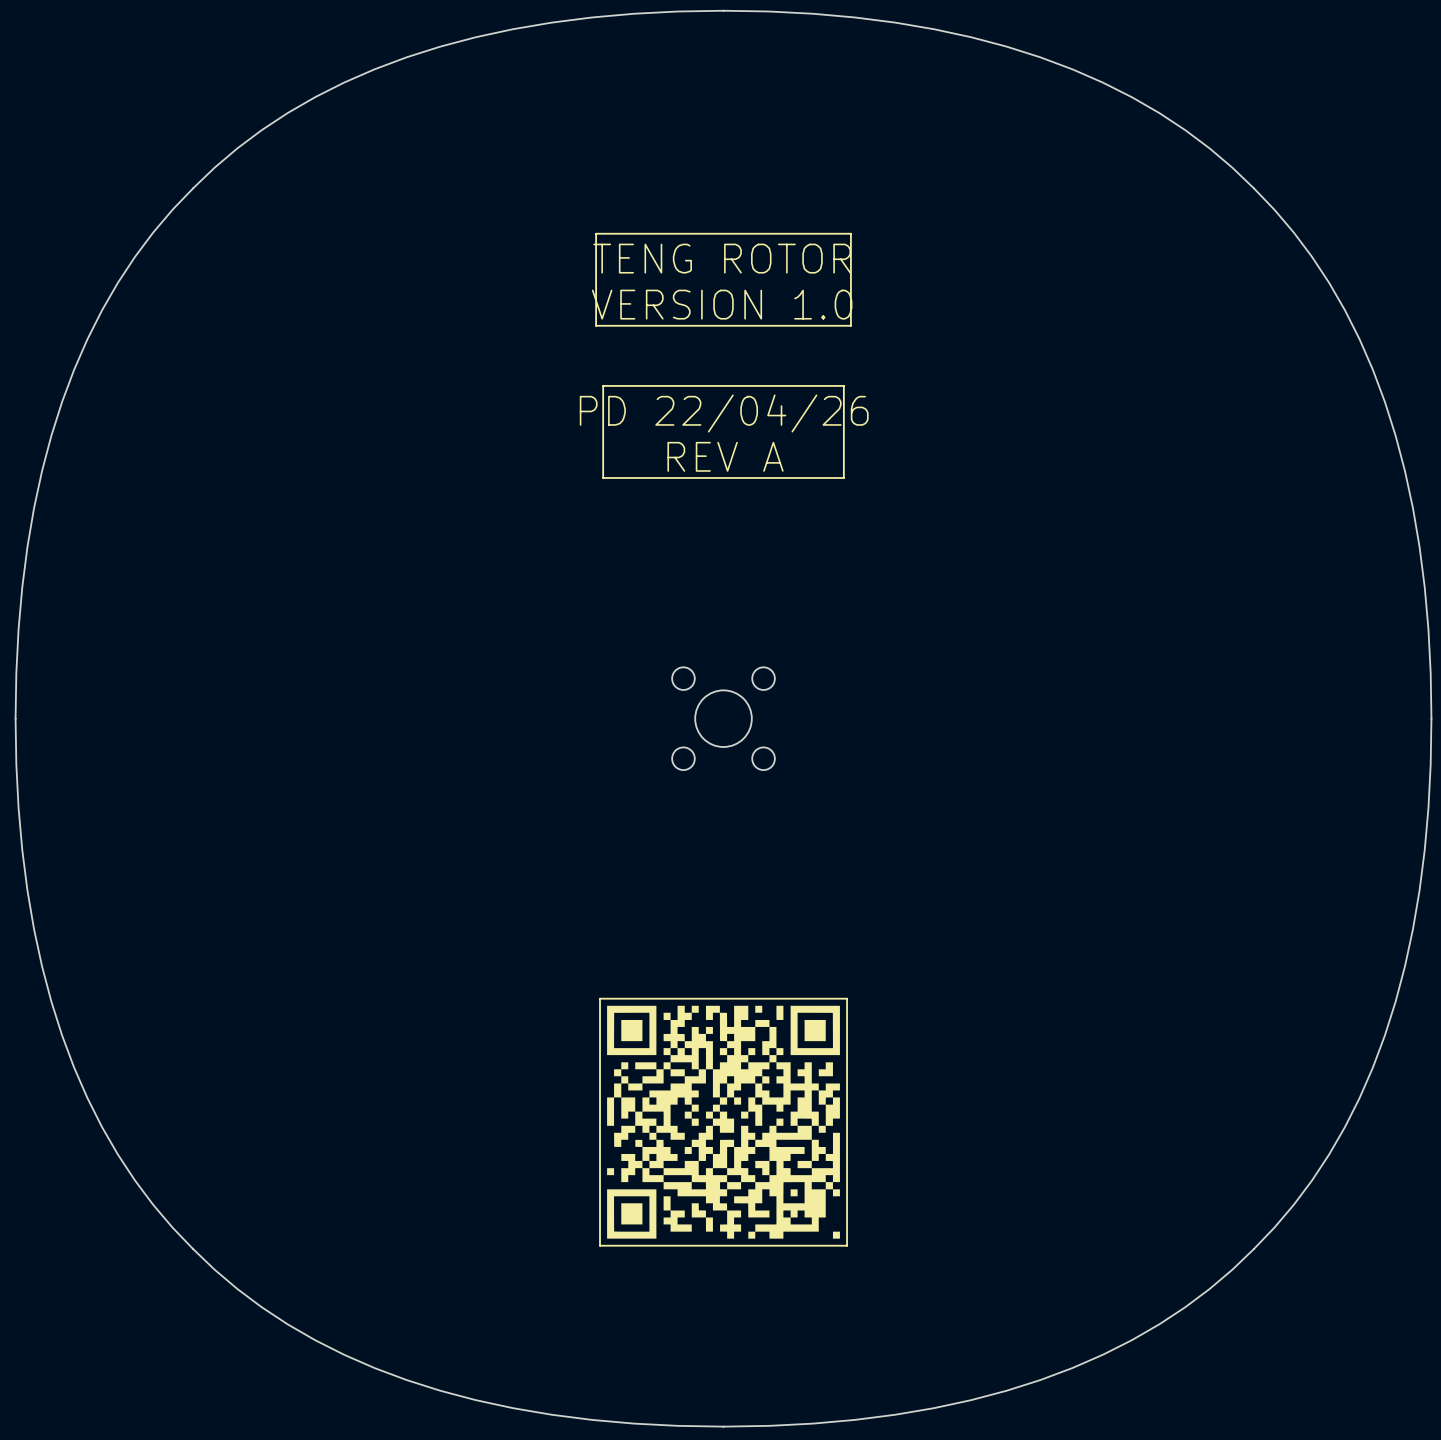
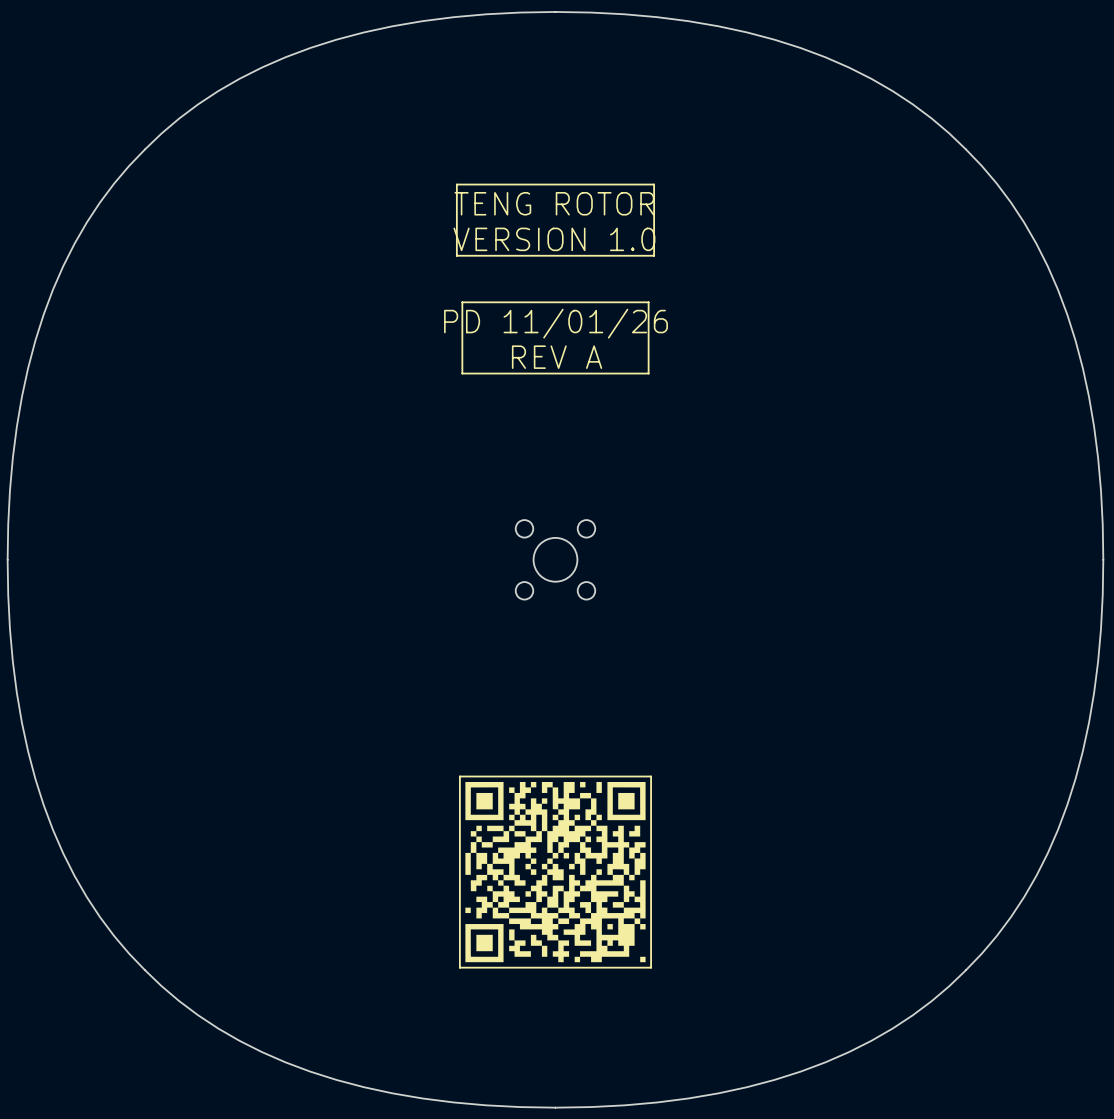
text: PD 22/04/26 (724, 413) -> PD 11/01/26 (556, 323)

